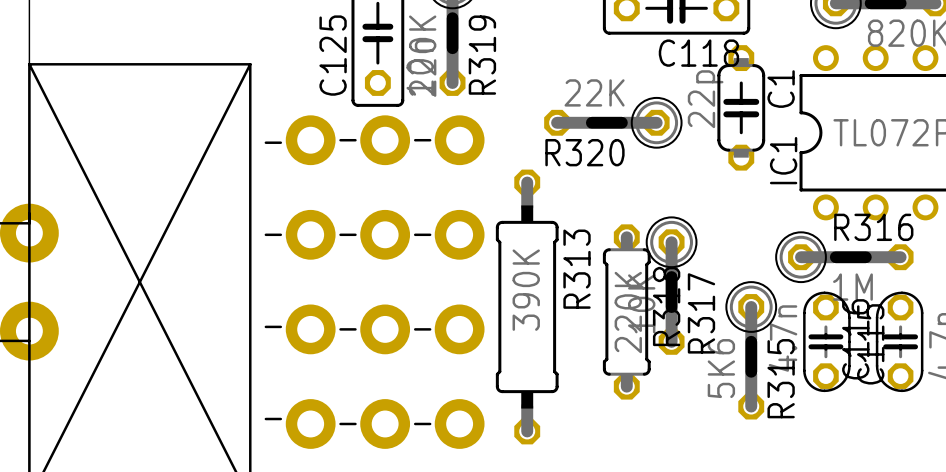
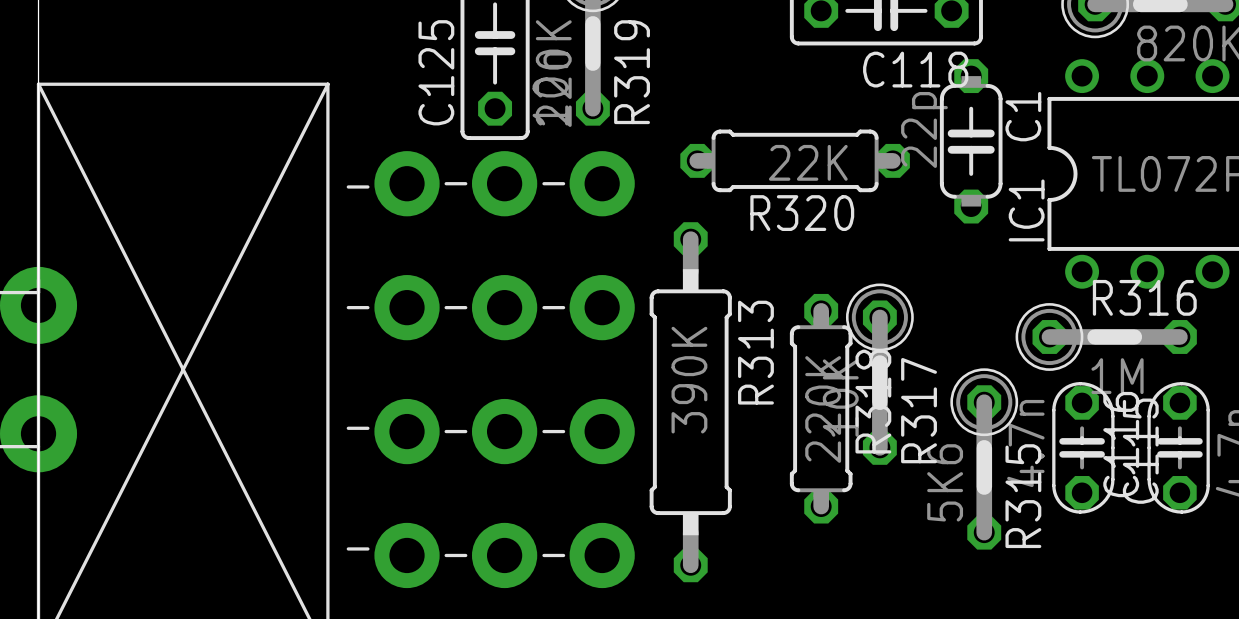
R320 value position: 22K (594, 92) -> 22K (808, 162)
R320 footprint: [544, 96, 683, 149] -> [680, 129, 910, 193]

